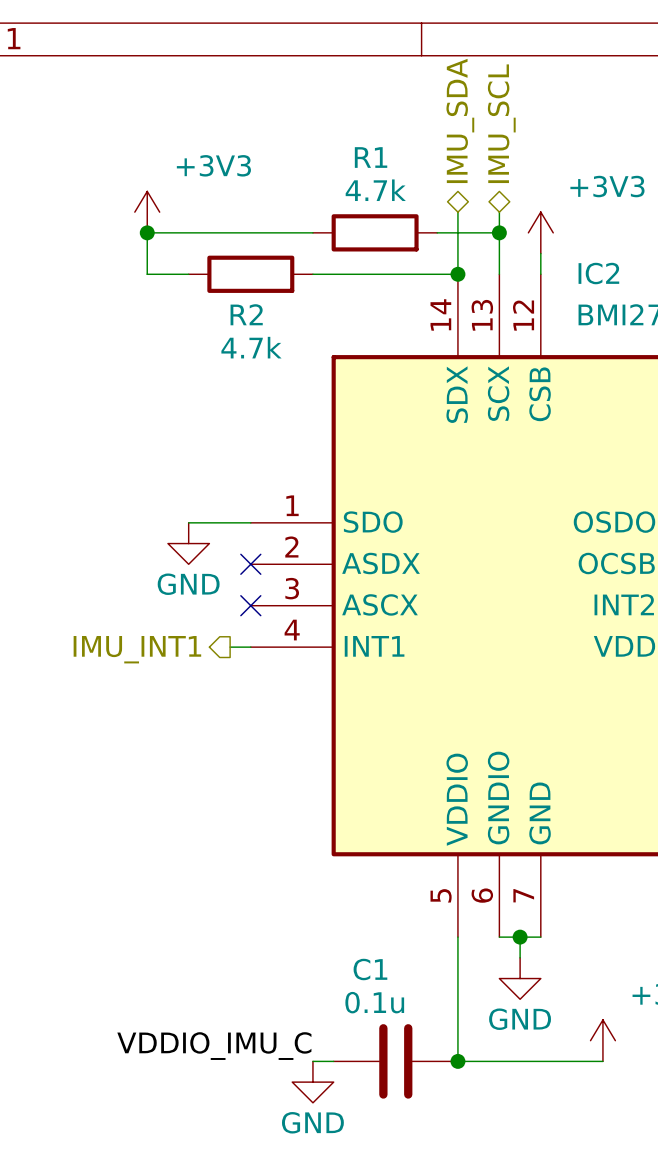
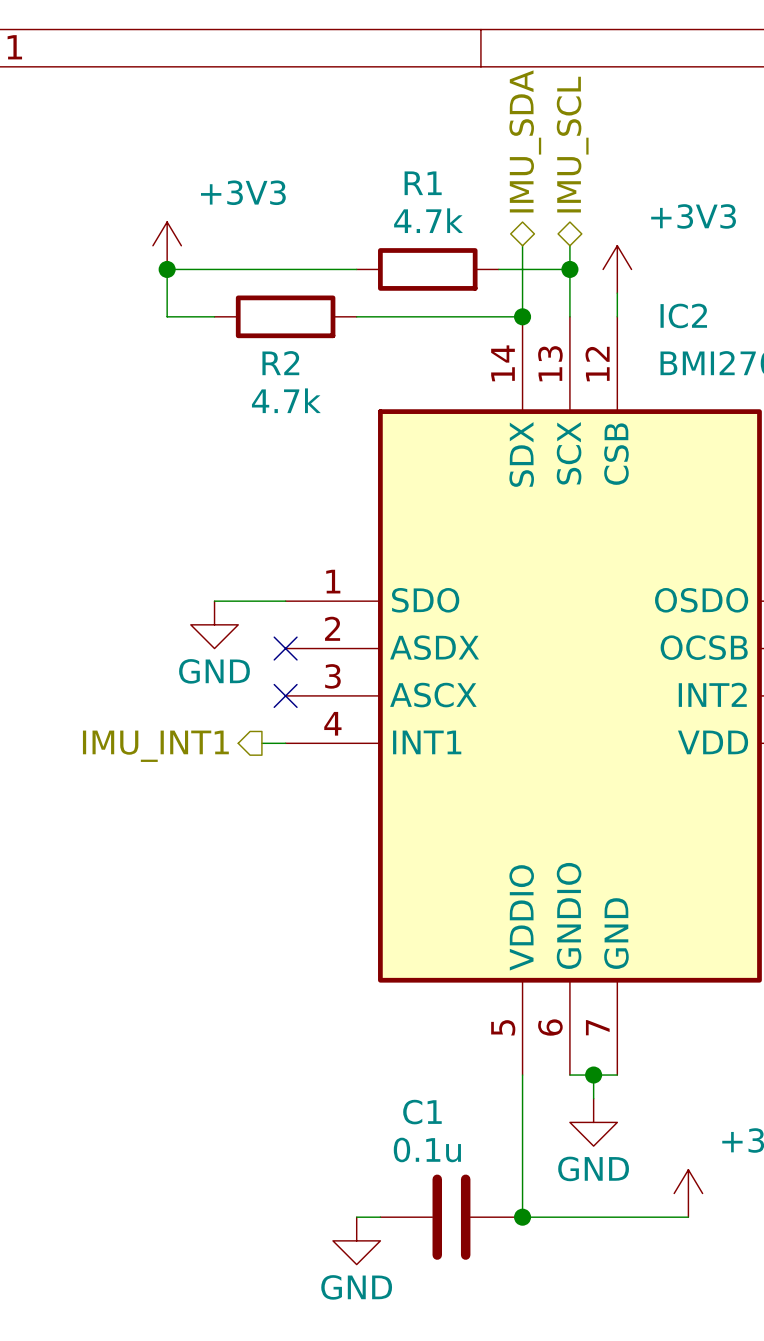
label: VDDIO_IMU_C (214, 1046) -> none

